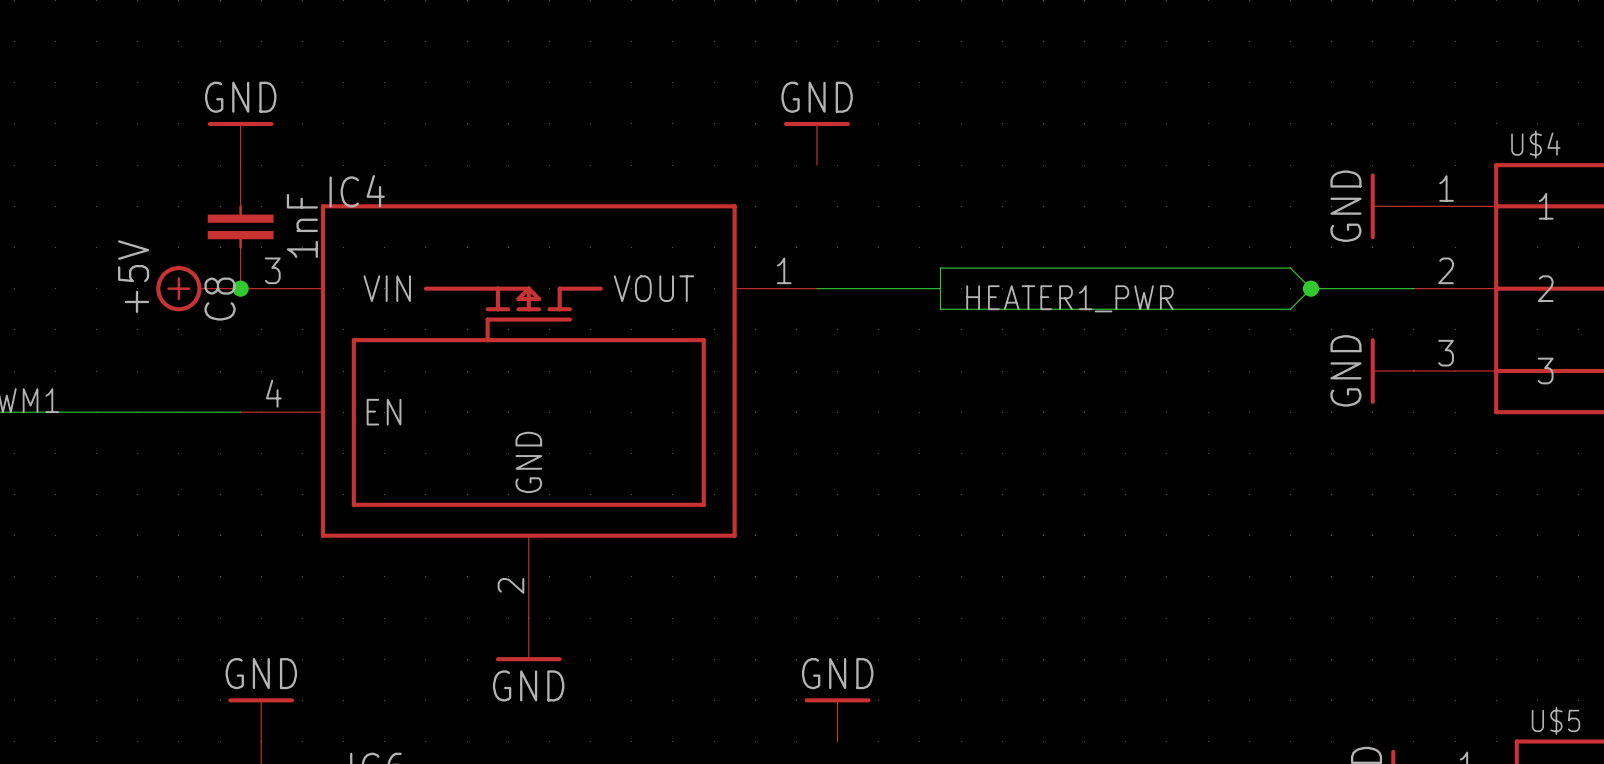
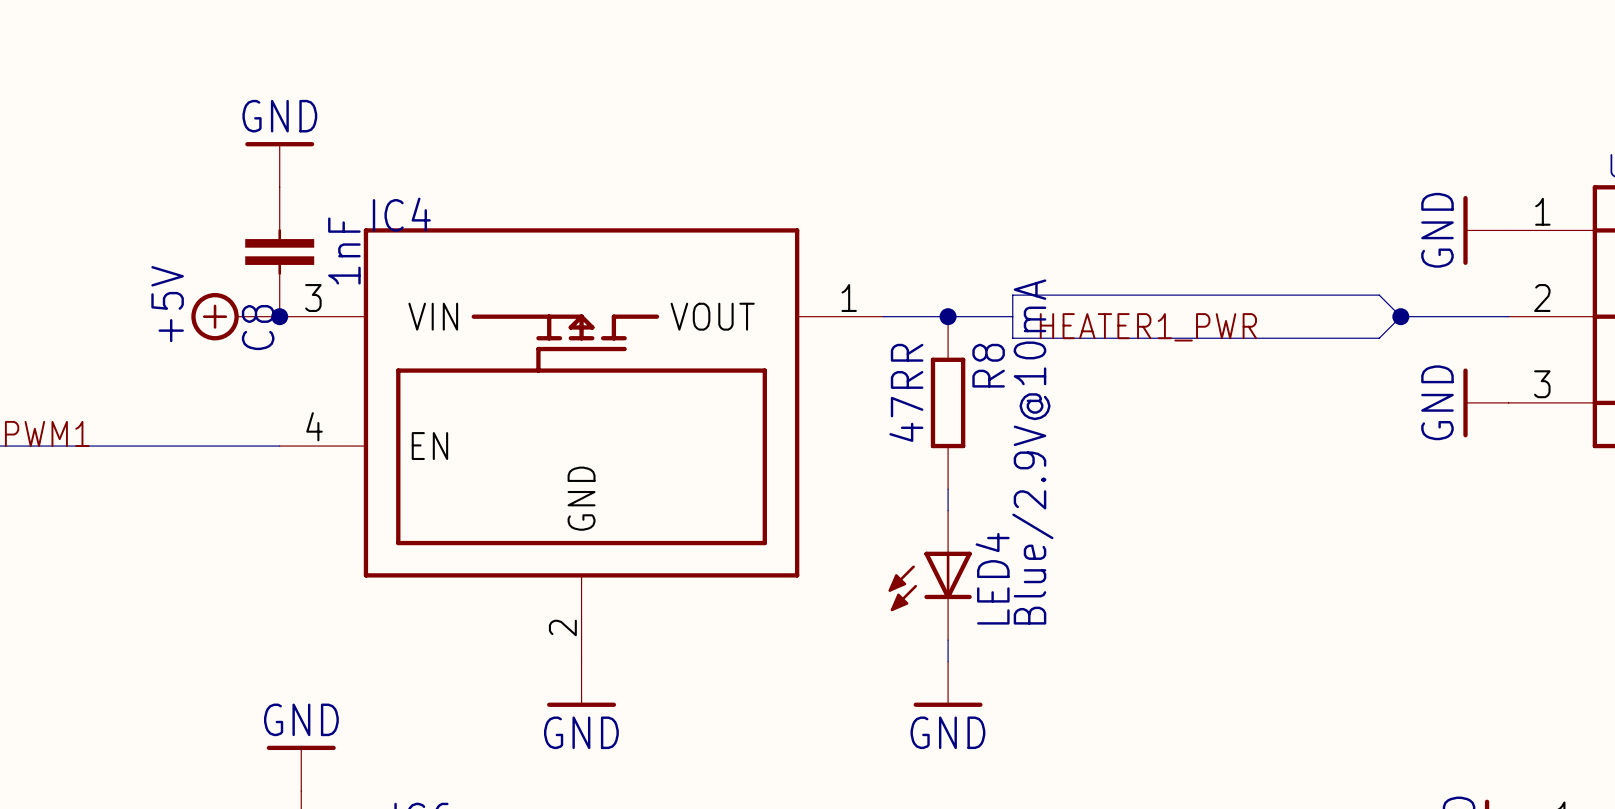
power symbol: GND (816, 143) -> none
junction: none -> (948, 316)
R8: none -> 47RR (948, 402)
wire: none -> (948, 489) (948, 510)
LED4: none -> Blue/2.9V@10mA (930, 575)
wire: none -> (948, 640) (948, 661)
power symbol rotation: 0° (837, 700) -> 180° (948, 704)
power symbol position: GND (837, 719) -> GND (948, 684)

